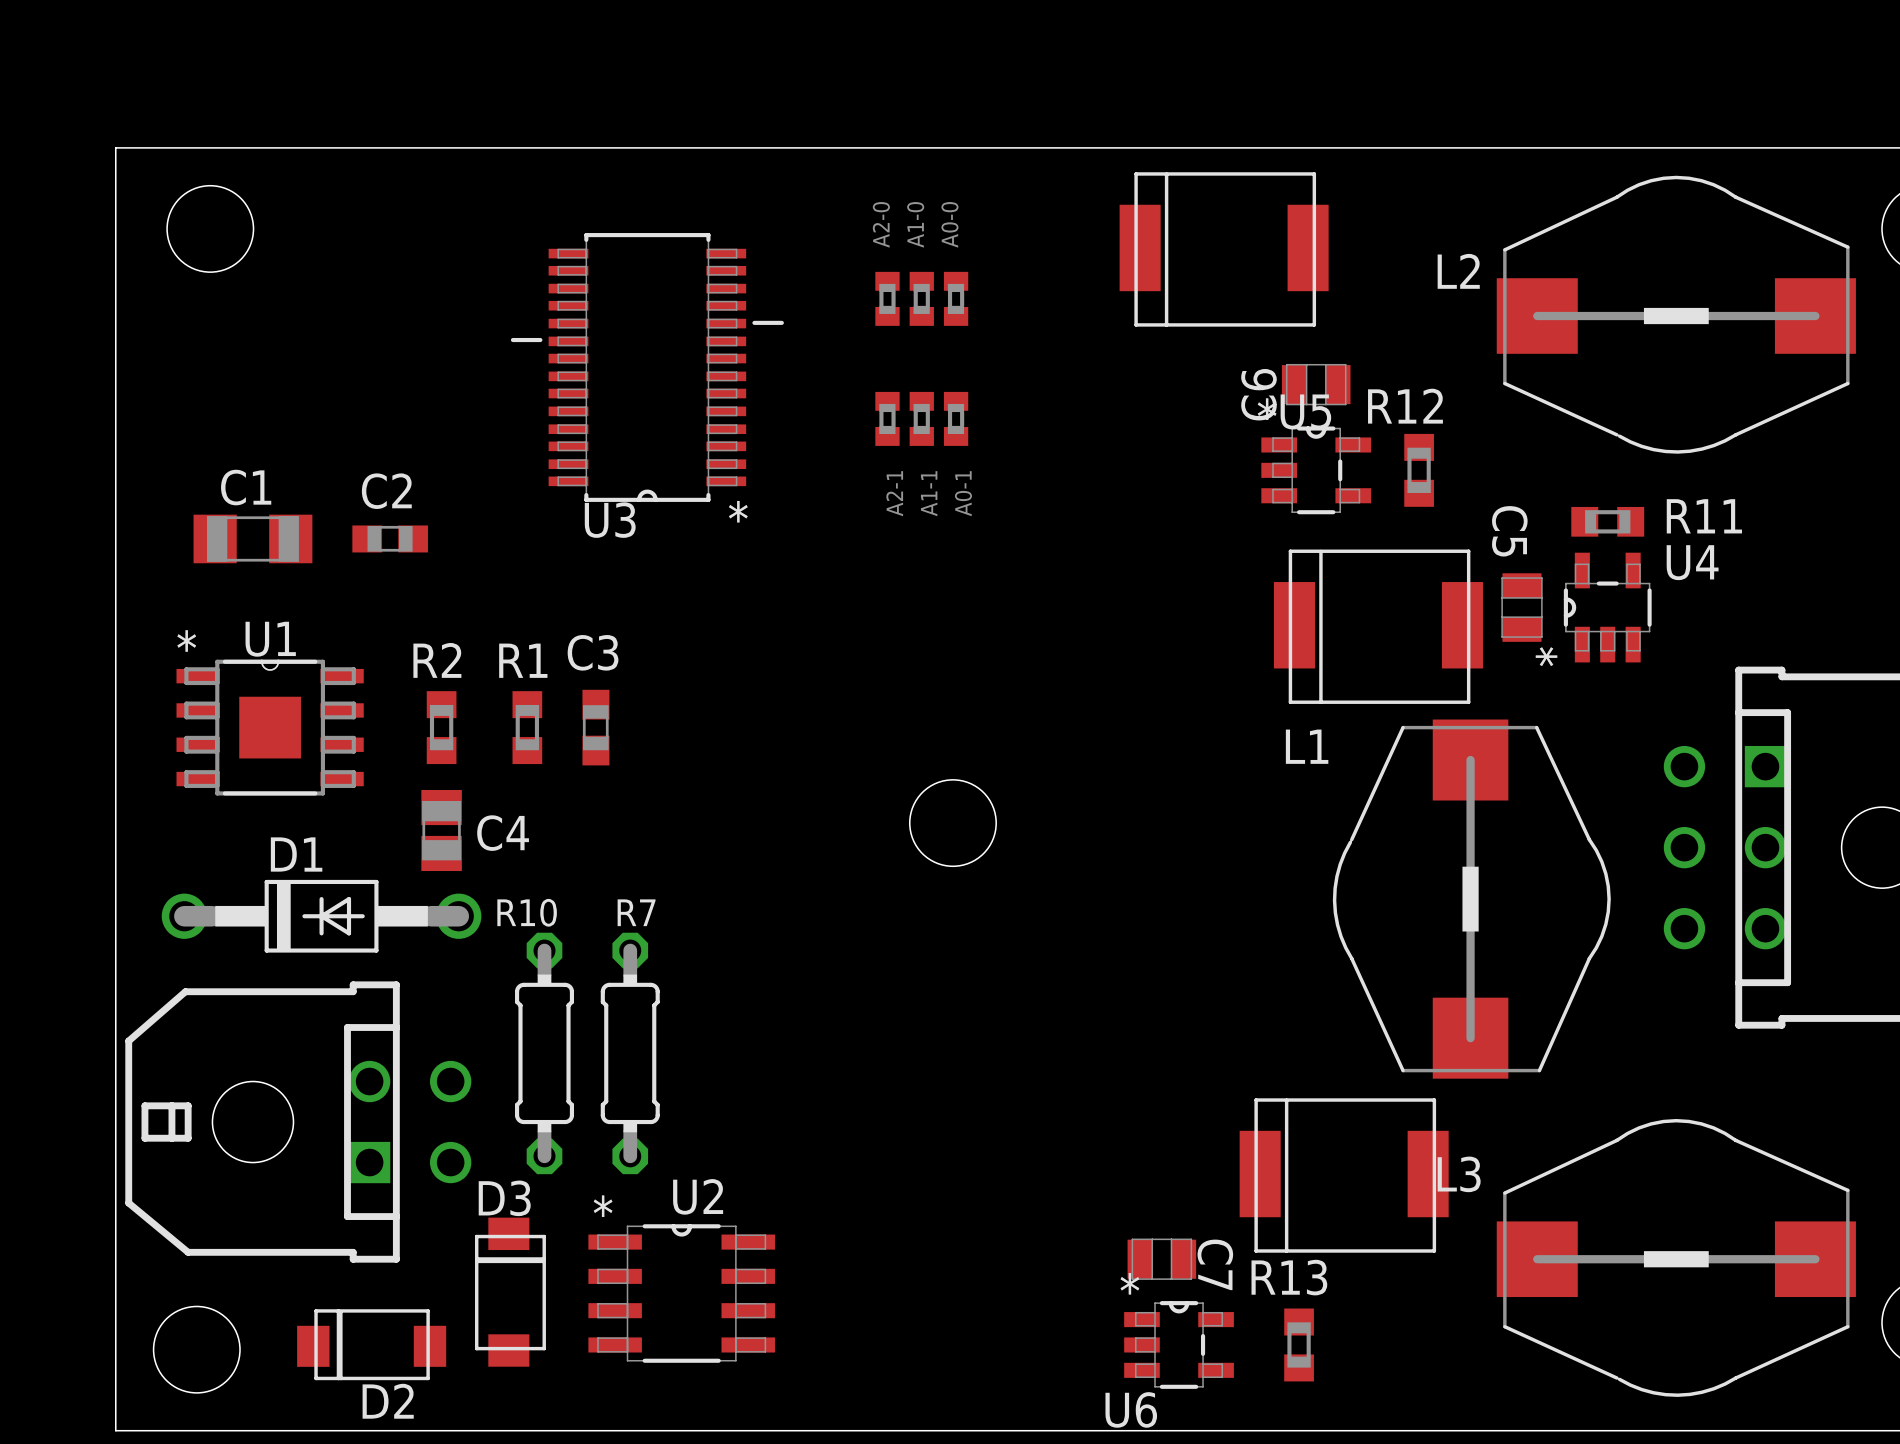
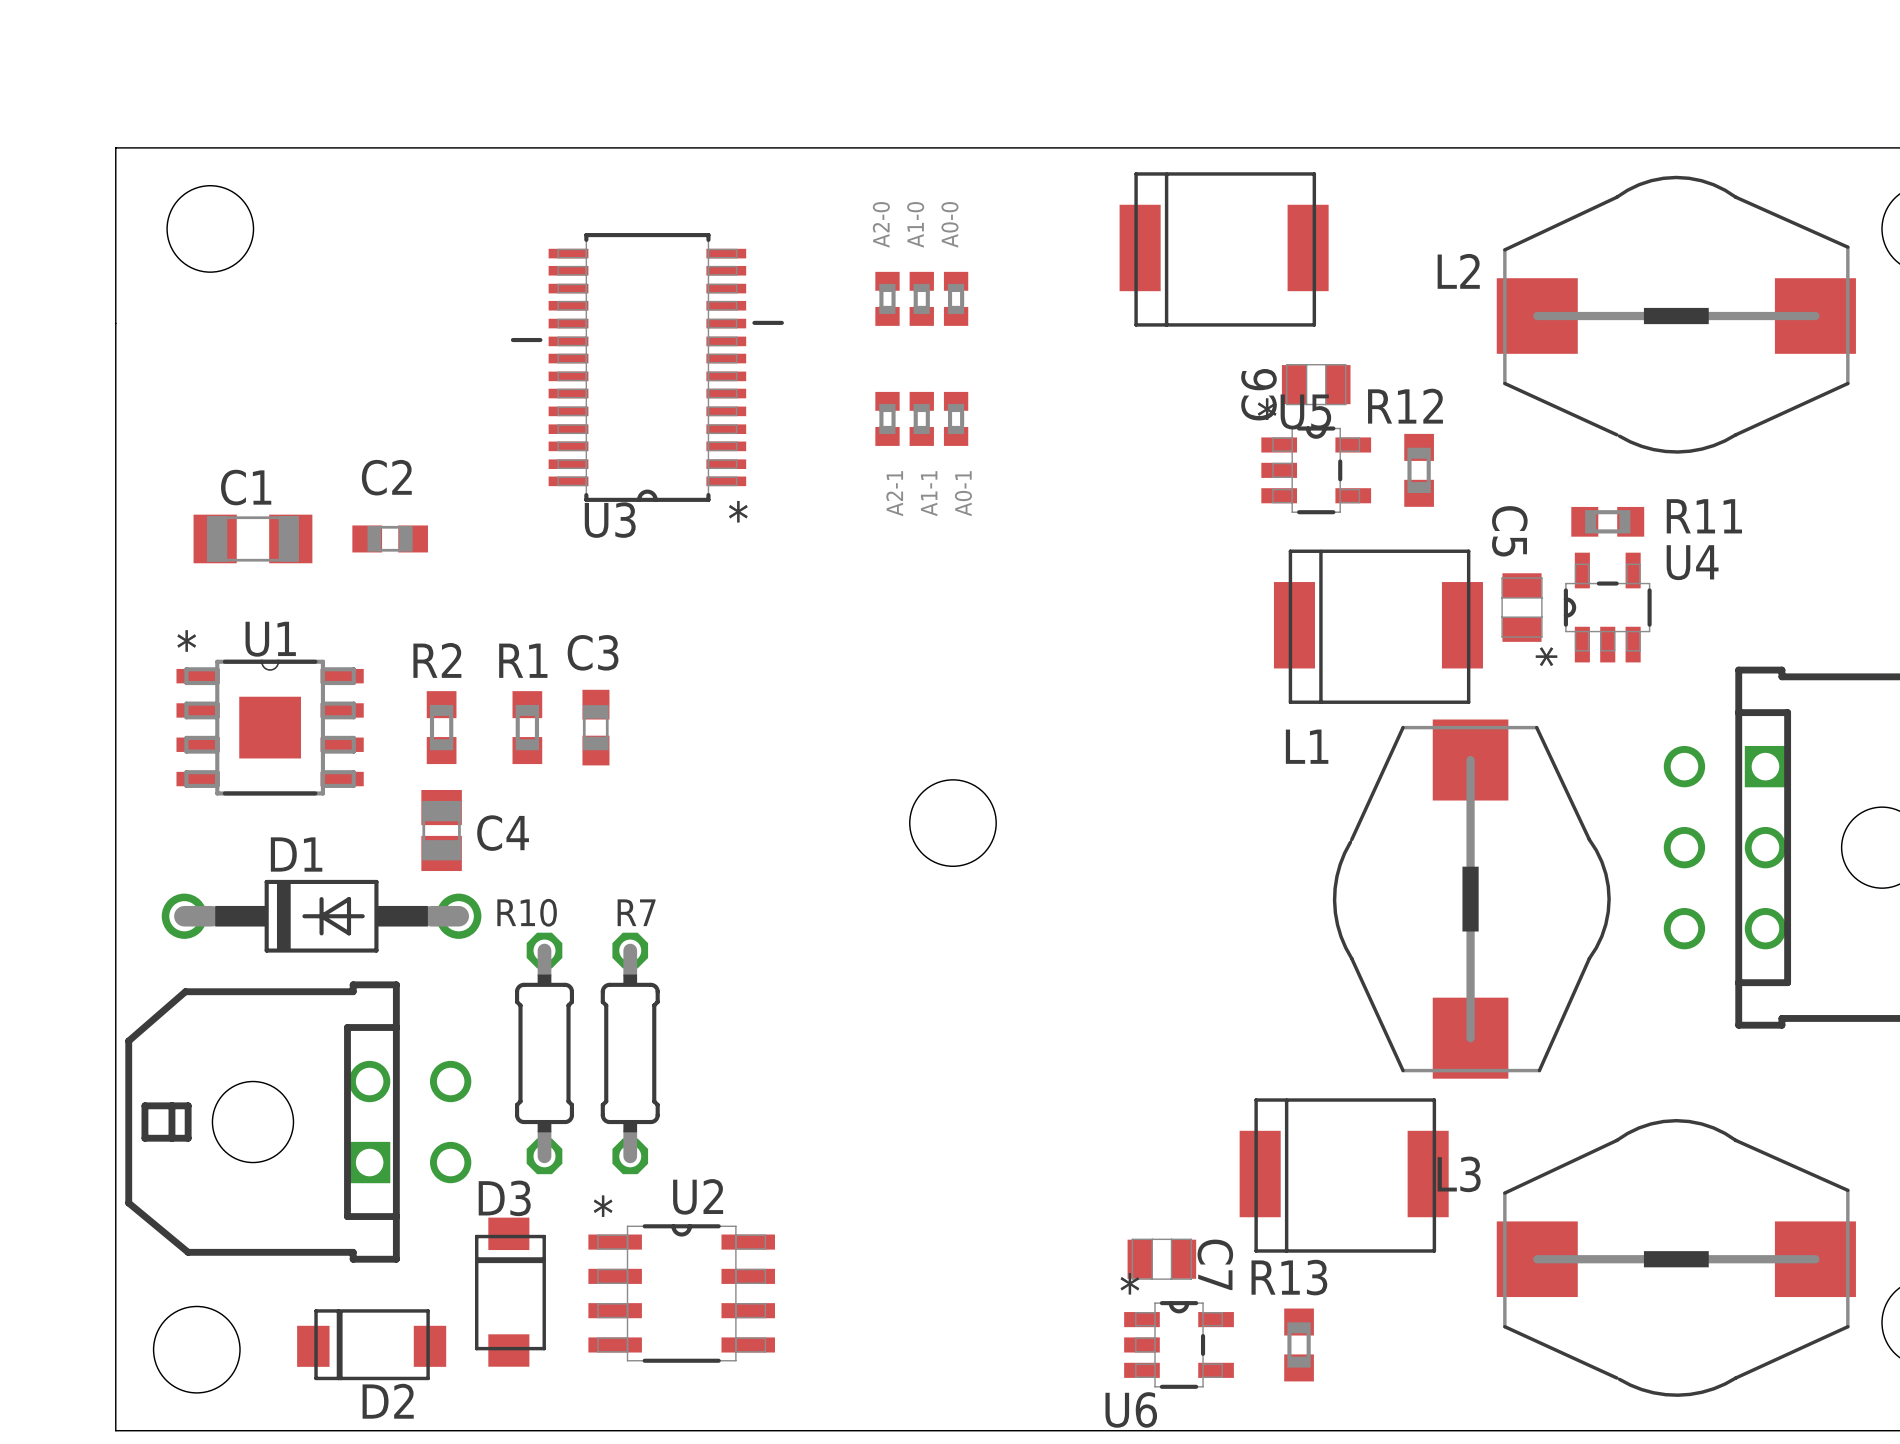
C2 name position: C2 (386, 491) -> C2 (386, 477)

